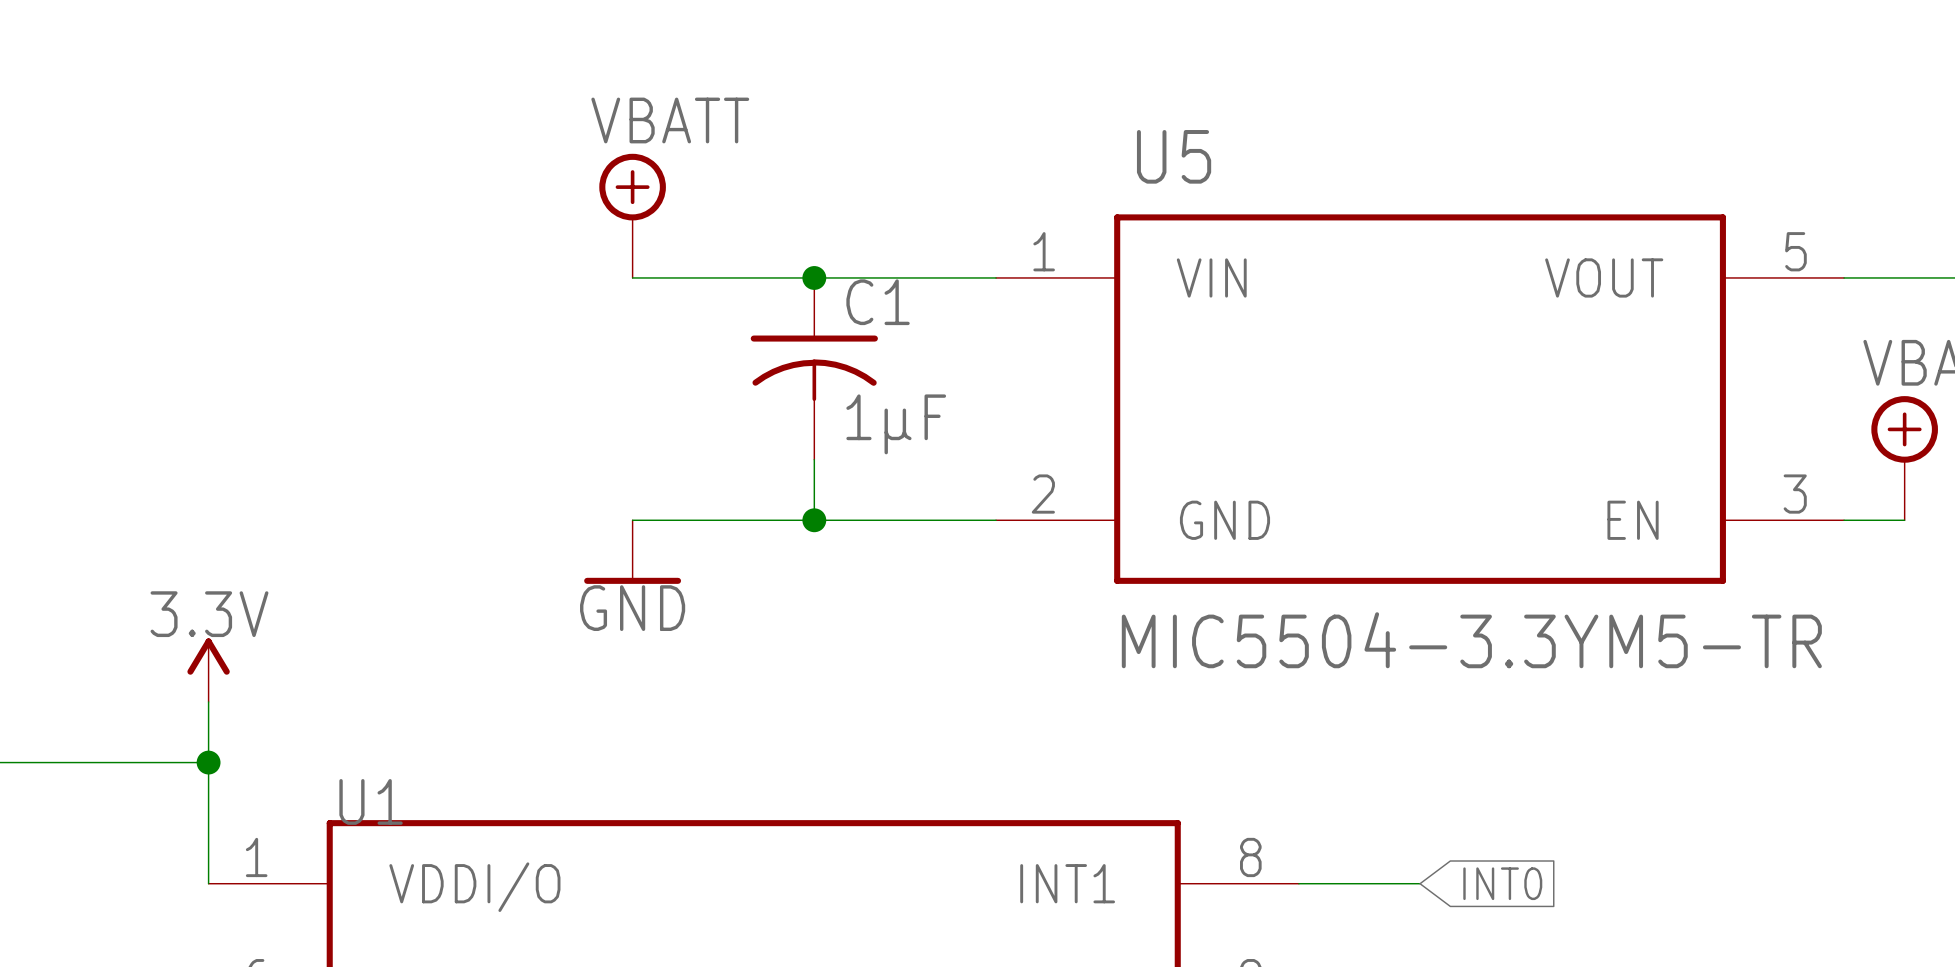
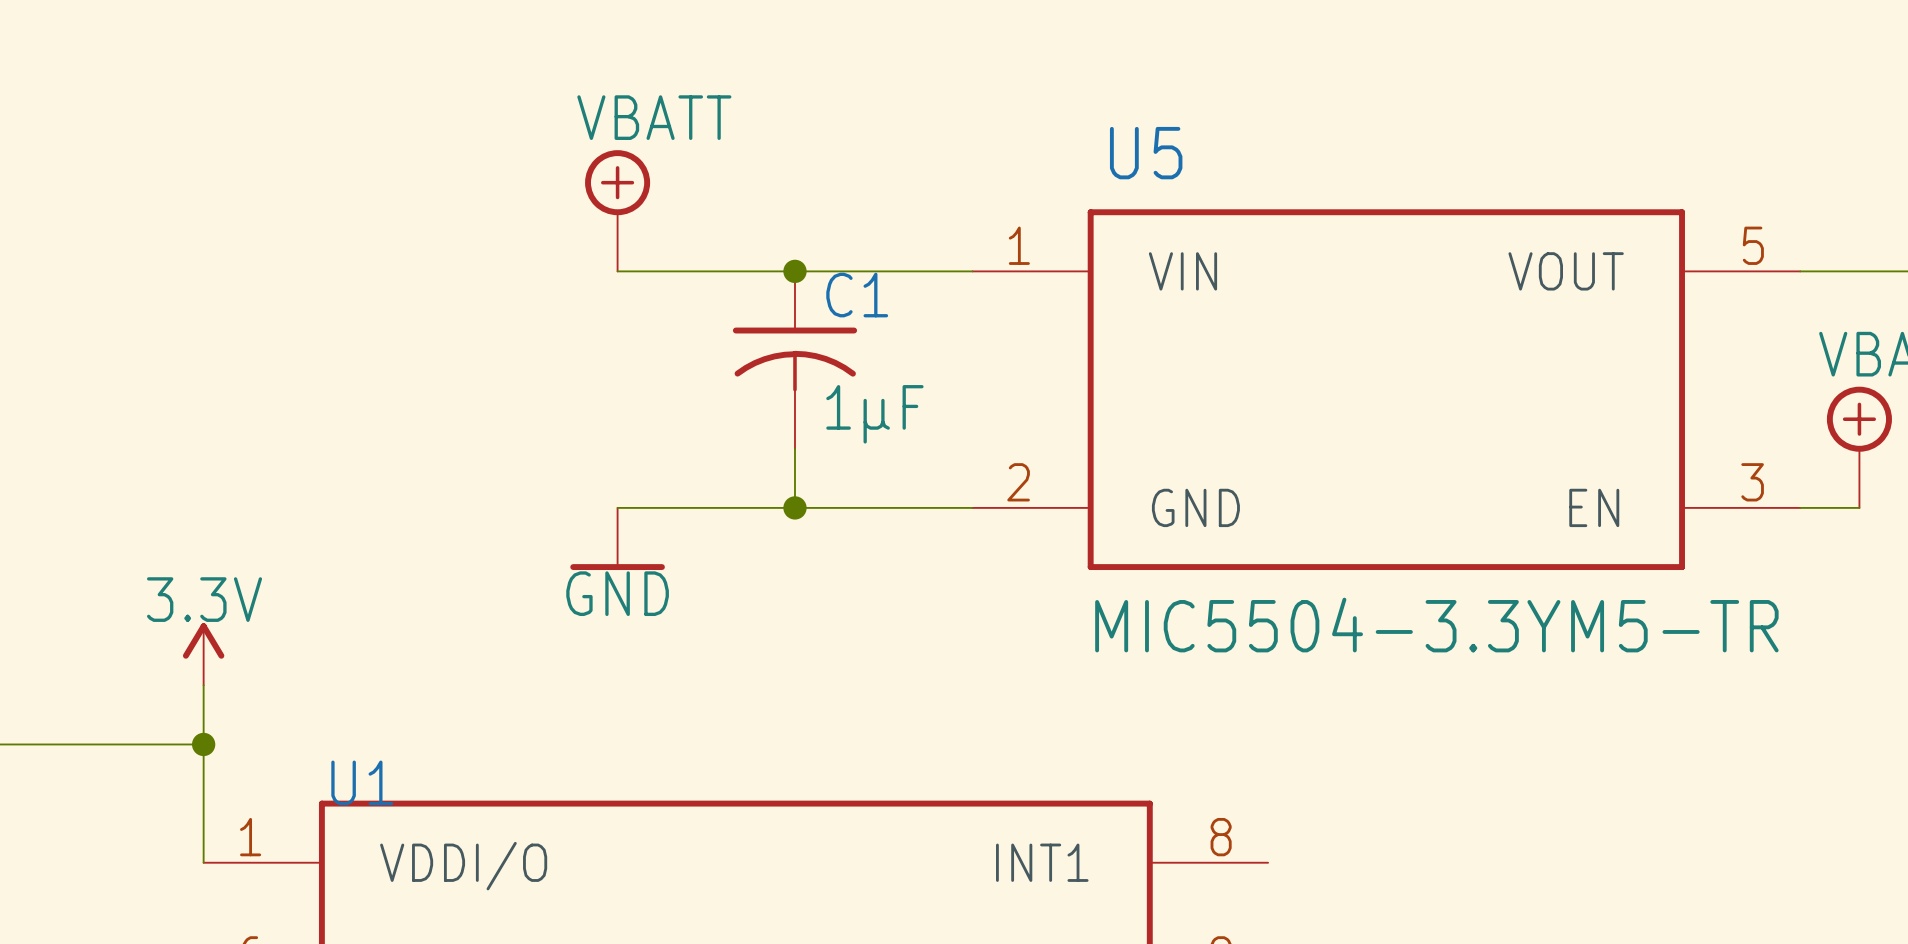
wire: (1298, 883) (1420, 883) -> none
global label: INT0 (1502, 883) -> none

